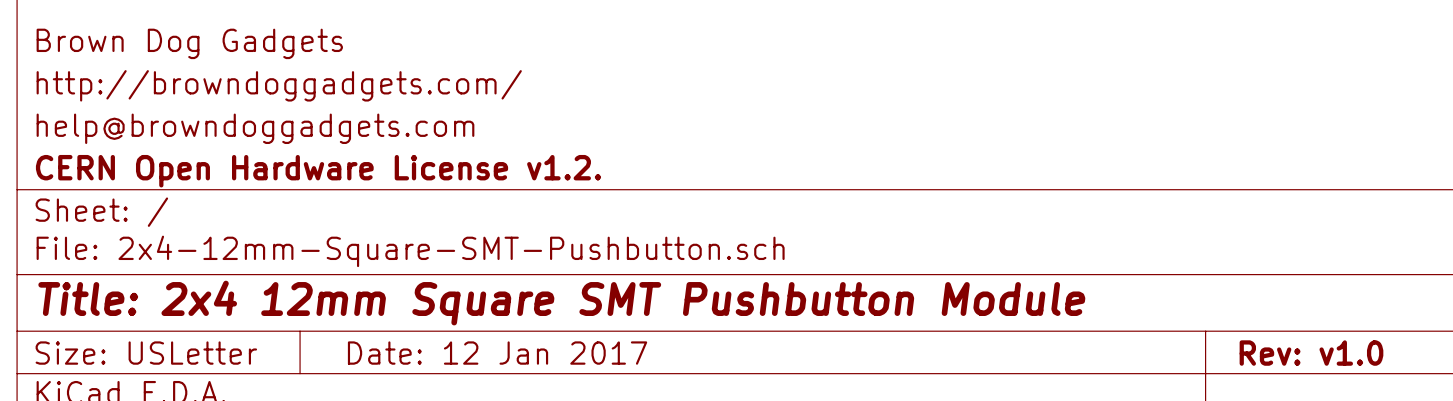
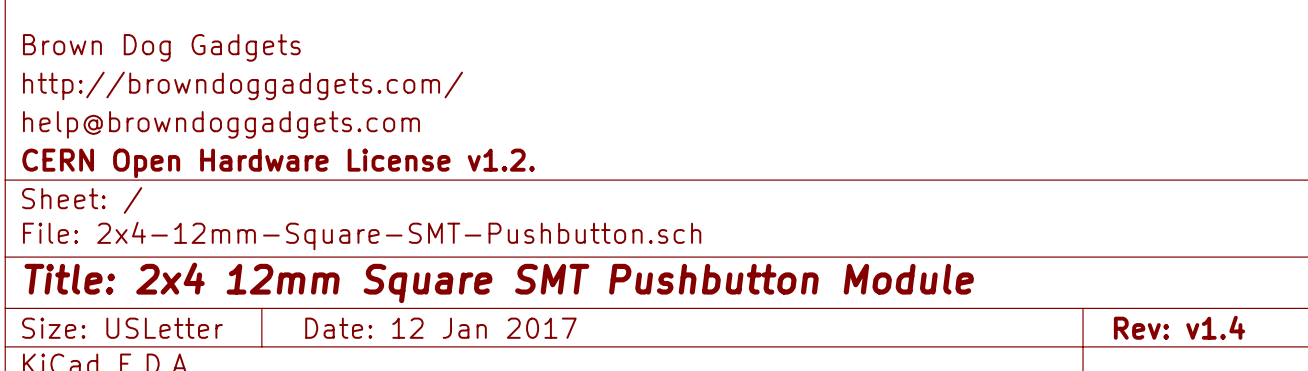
title block: Rev: v1.0 (1311, 353) -> Rev: v1.4 (1179, 327)

